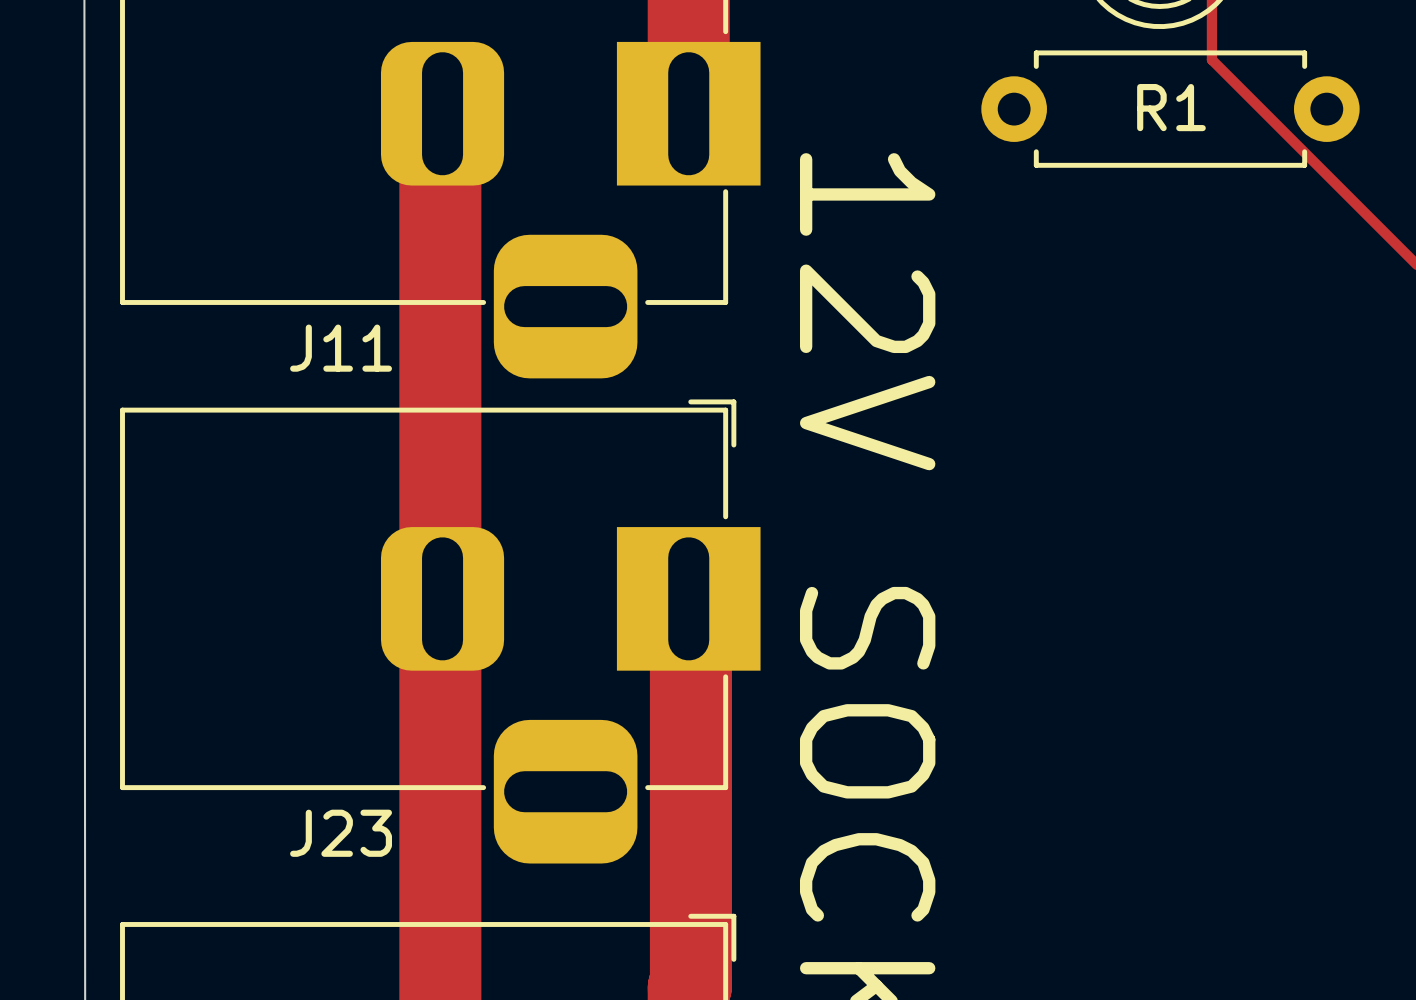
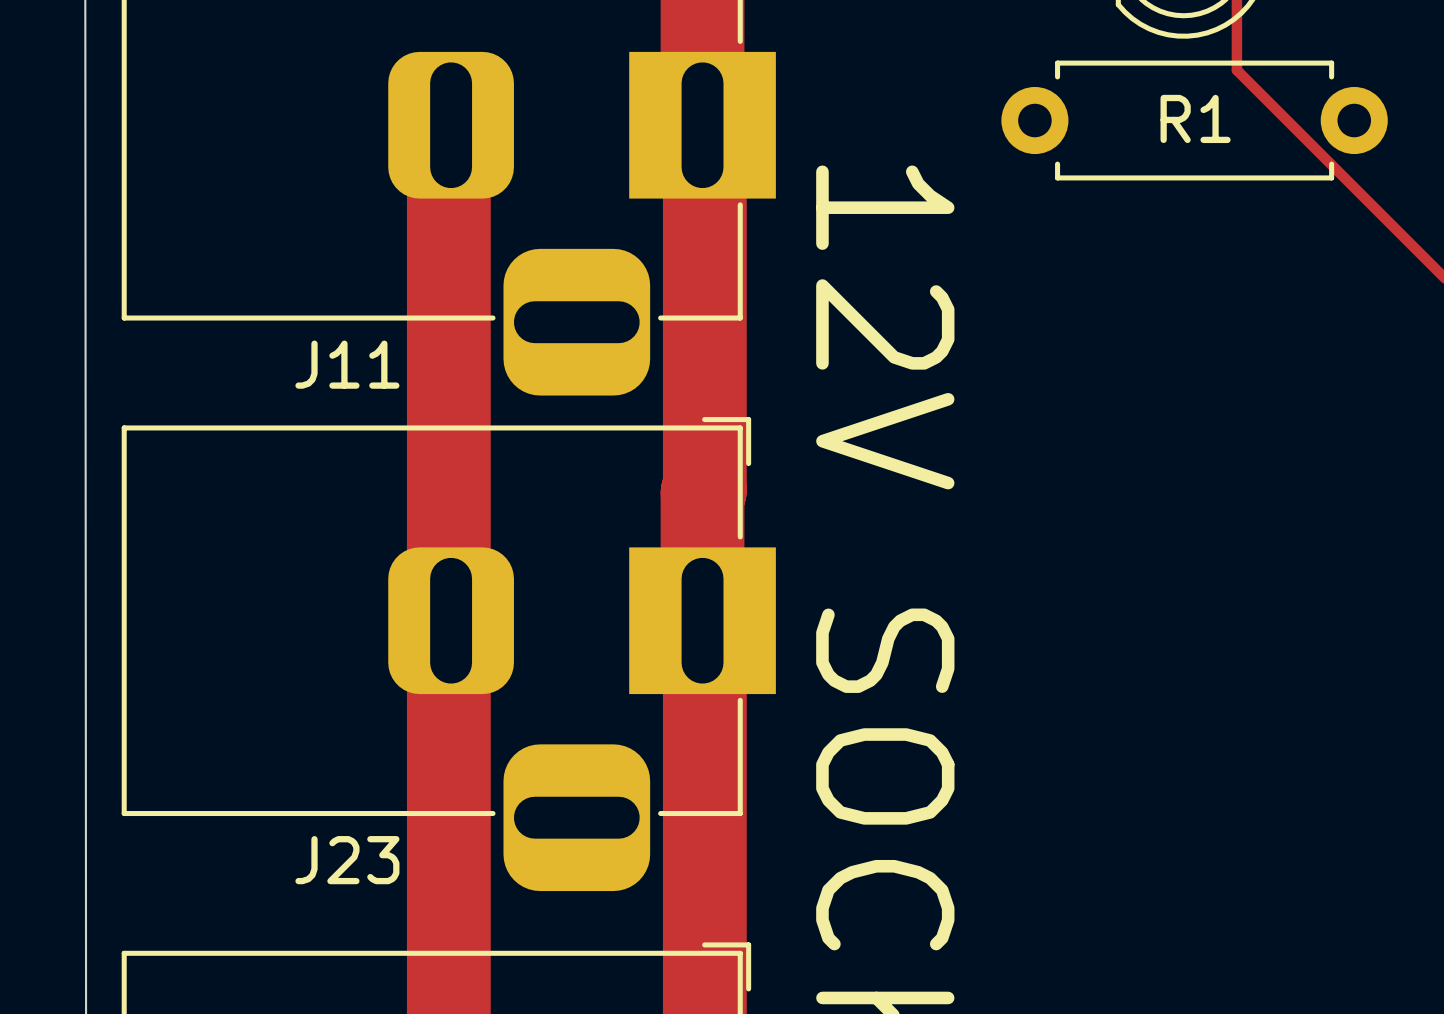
track: none -> (702, 125) (704, 127) (704, 490) (702, 492) (702, 620)

